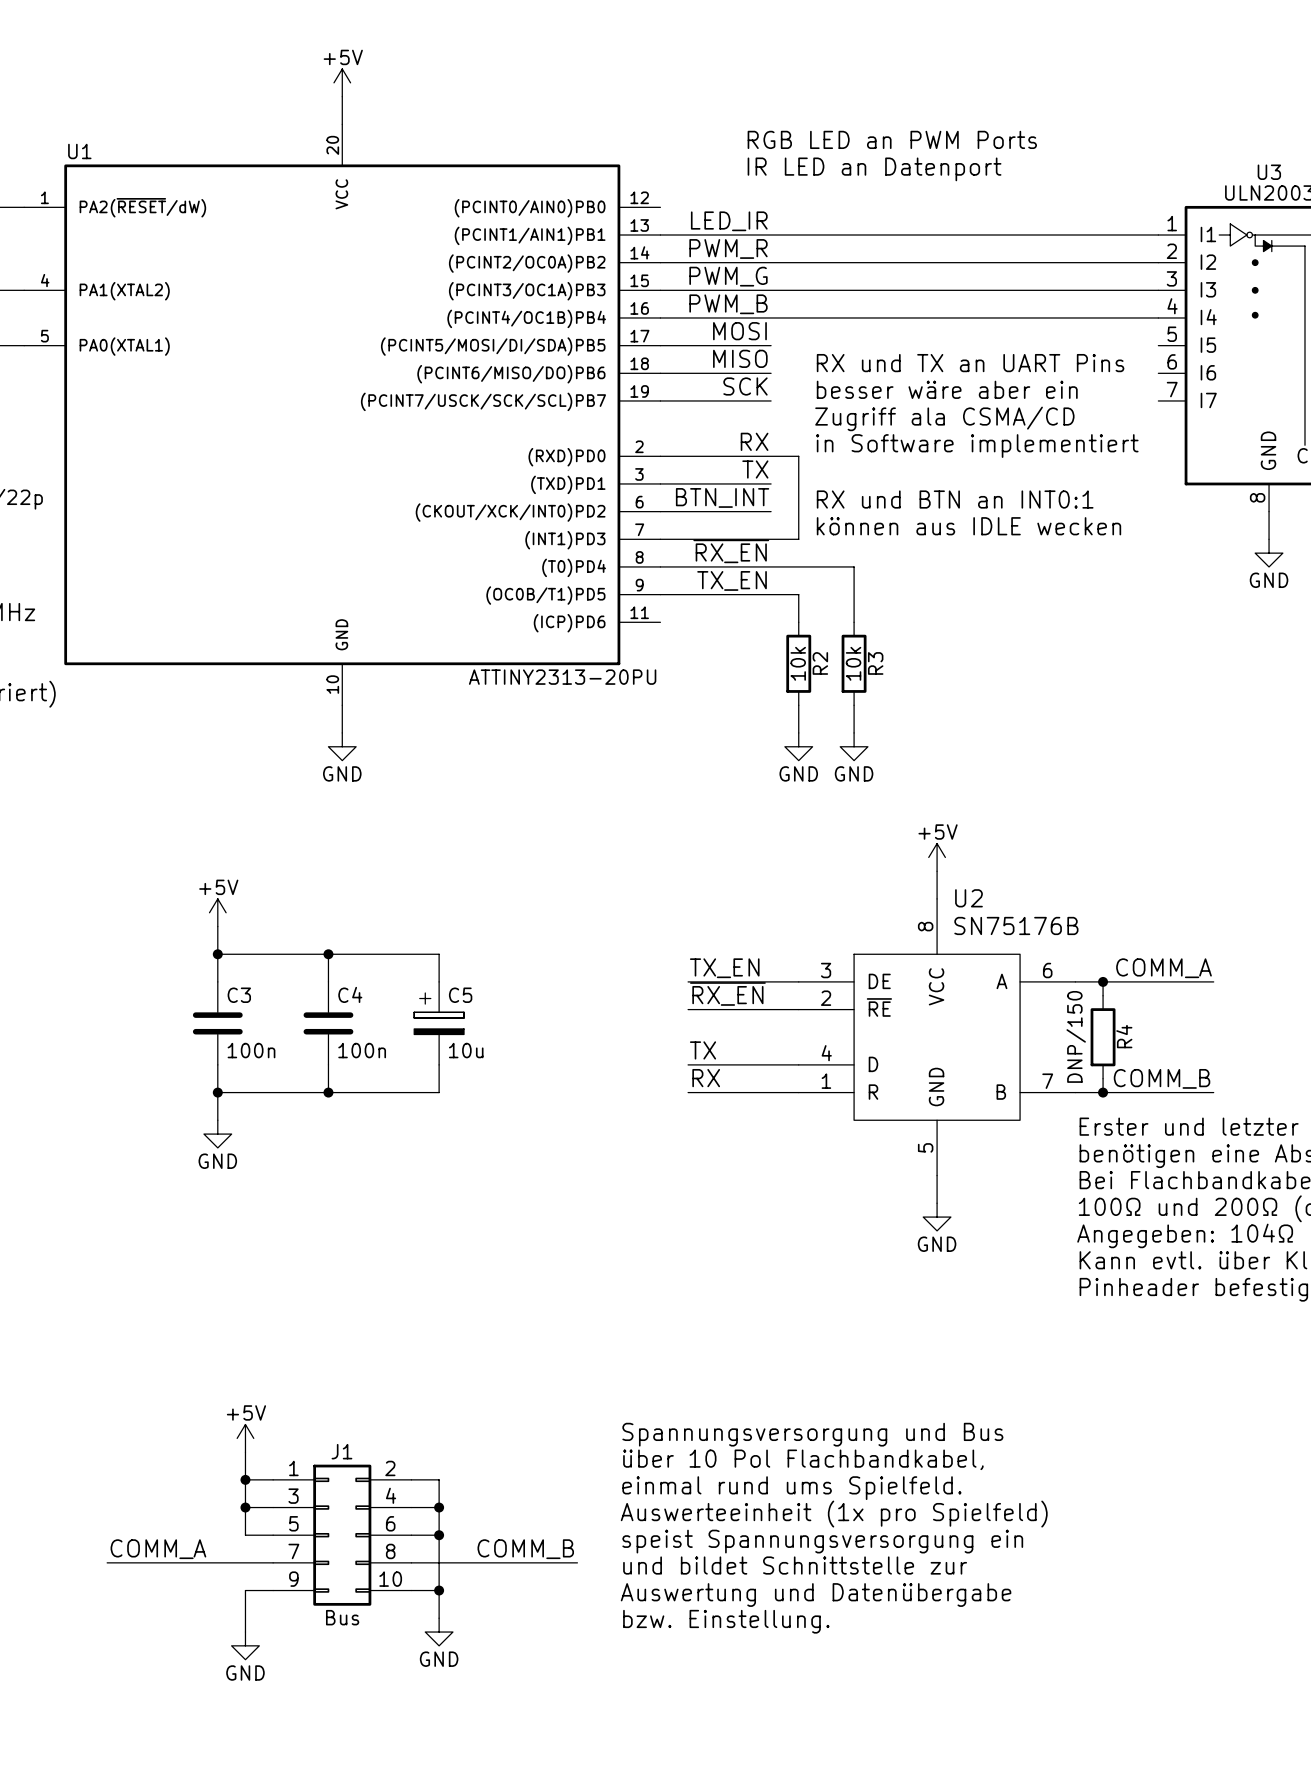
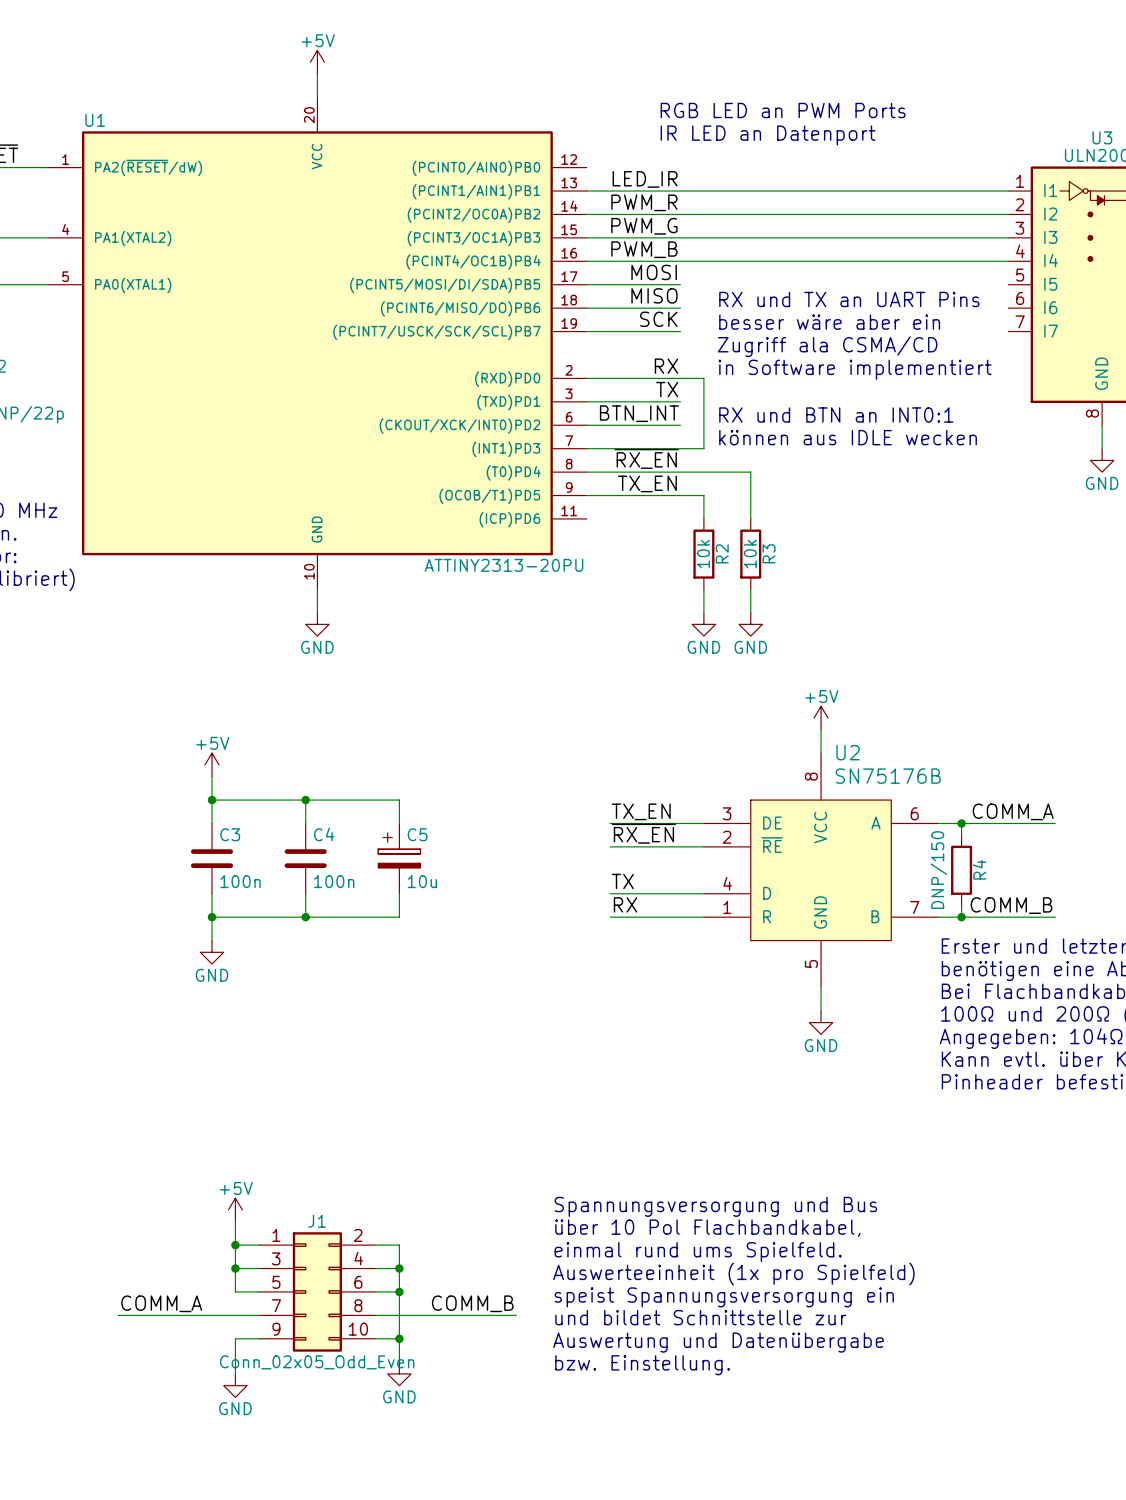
J1 value: Bus (342, 1617) -> Conn_02x05_Odd_Even (317, 1362)

